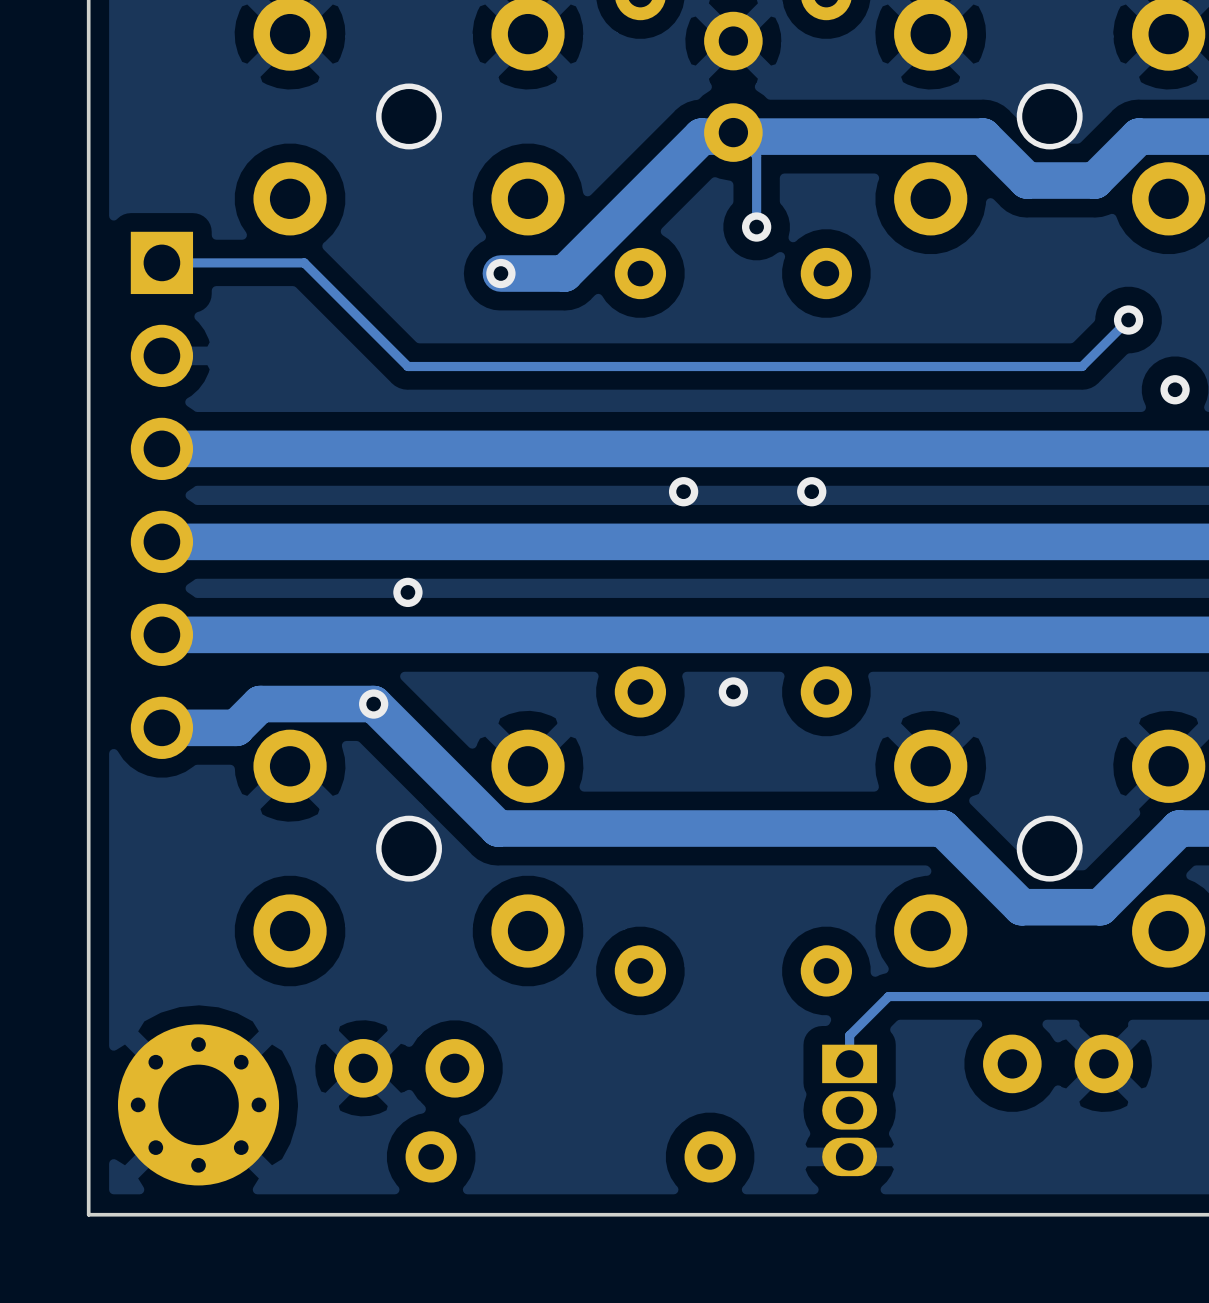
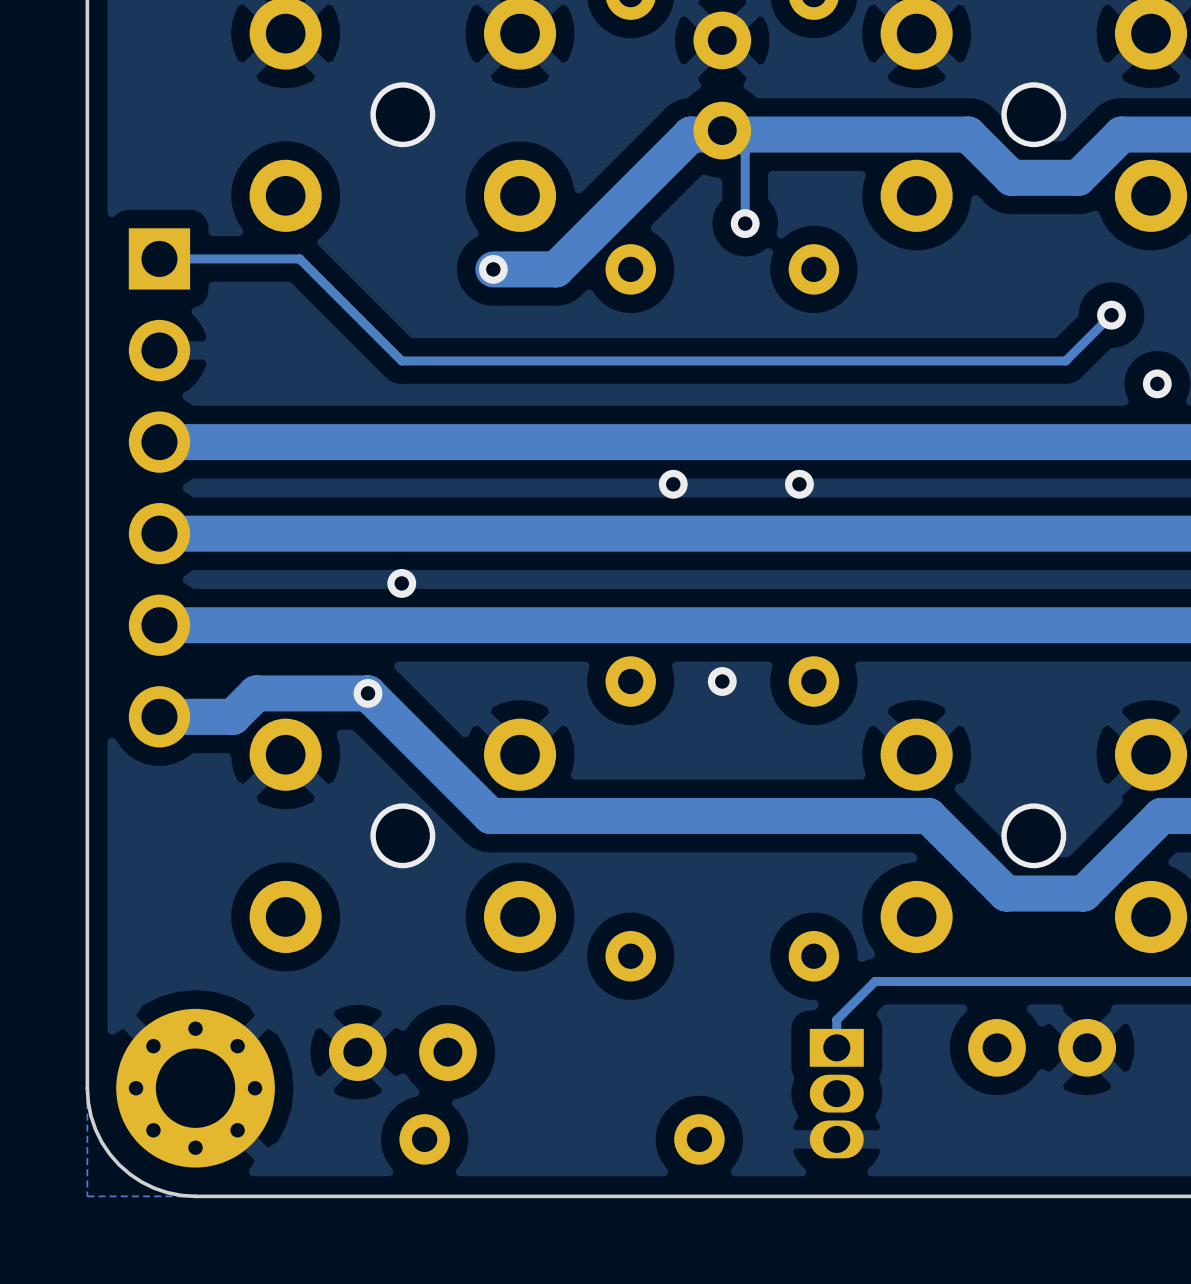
board edge: (88, 1104) (88, 1214) (198, 1214) -> (87, 1088) (88, 1102) (95, 1129) (101, 1142) (119, 1164) (141, 1181) (154, 1188) (167, 1192) (195, 1196)

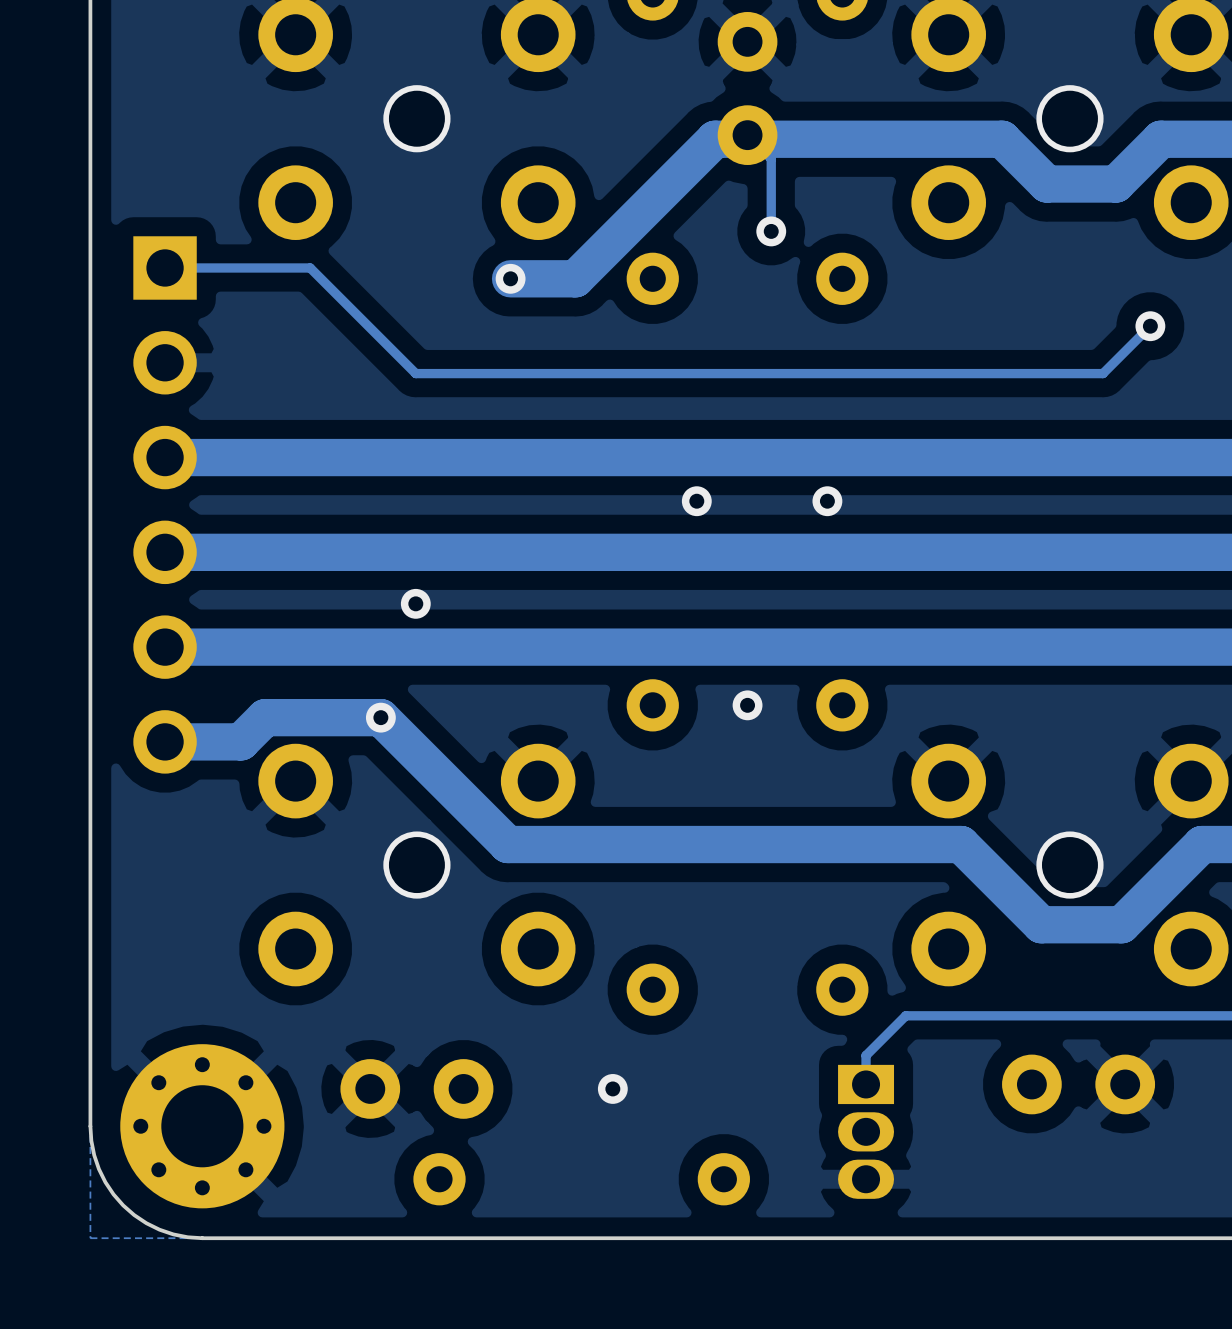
via: (1157, 383) -> none
via: none -> (612, 1088)

